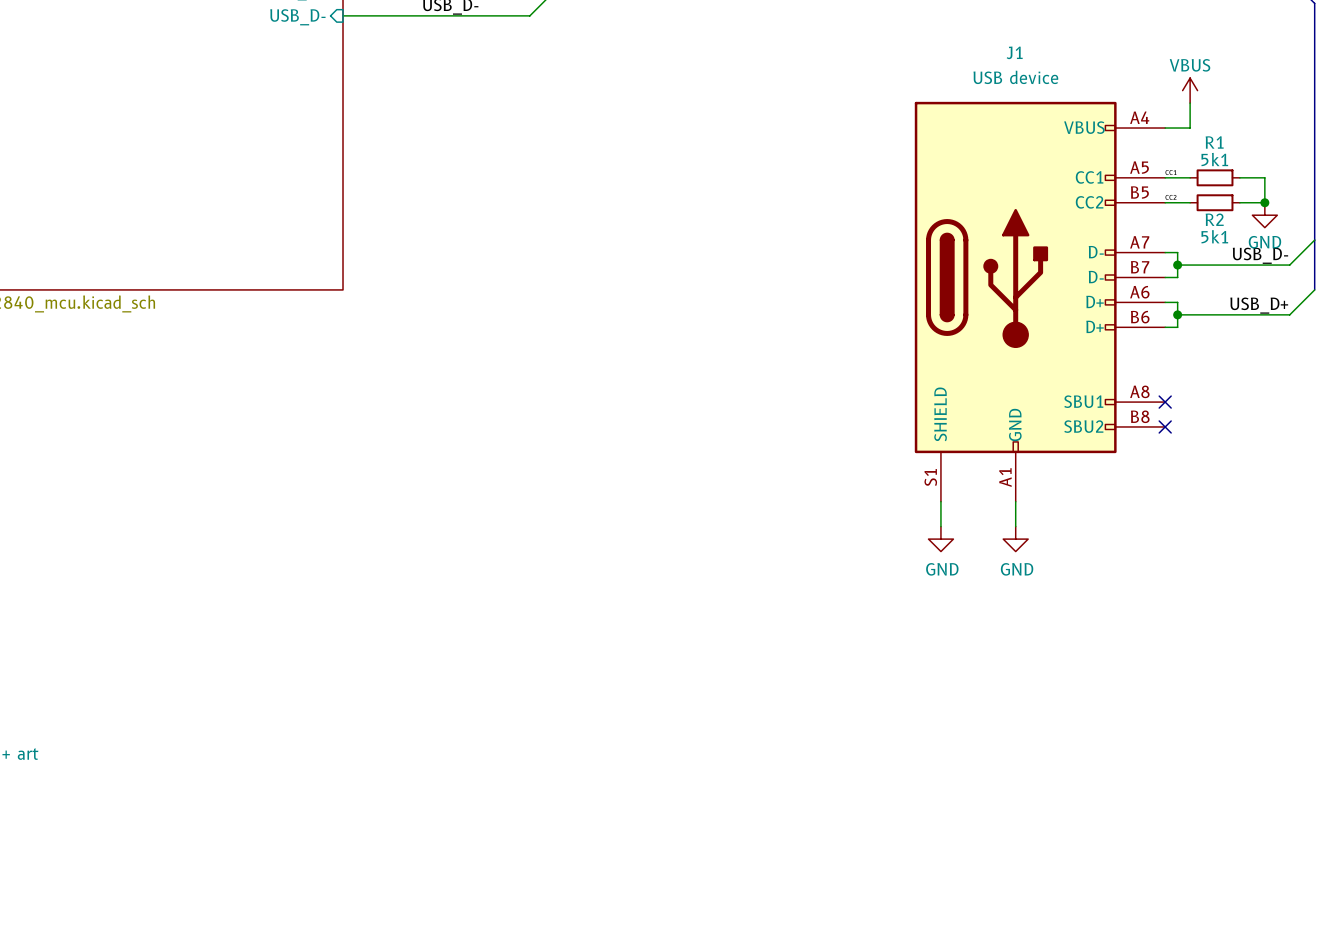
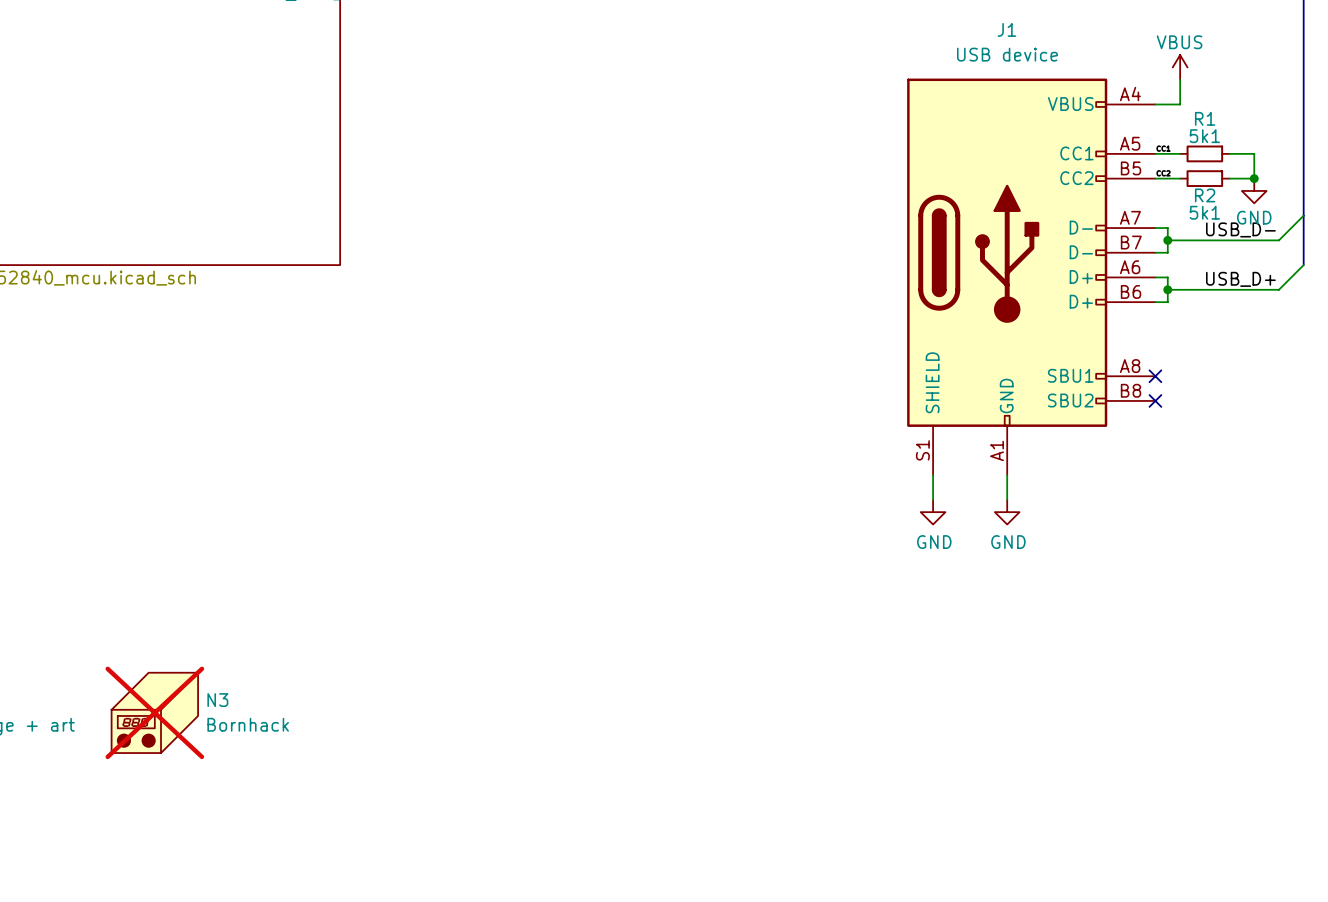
N3: none -> Bornhack (154, 712)

